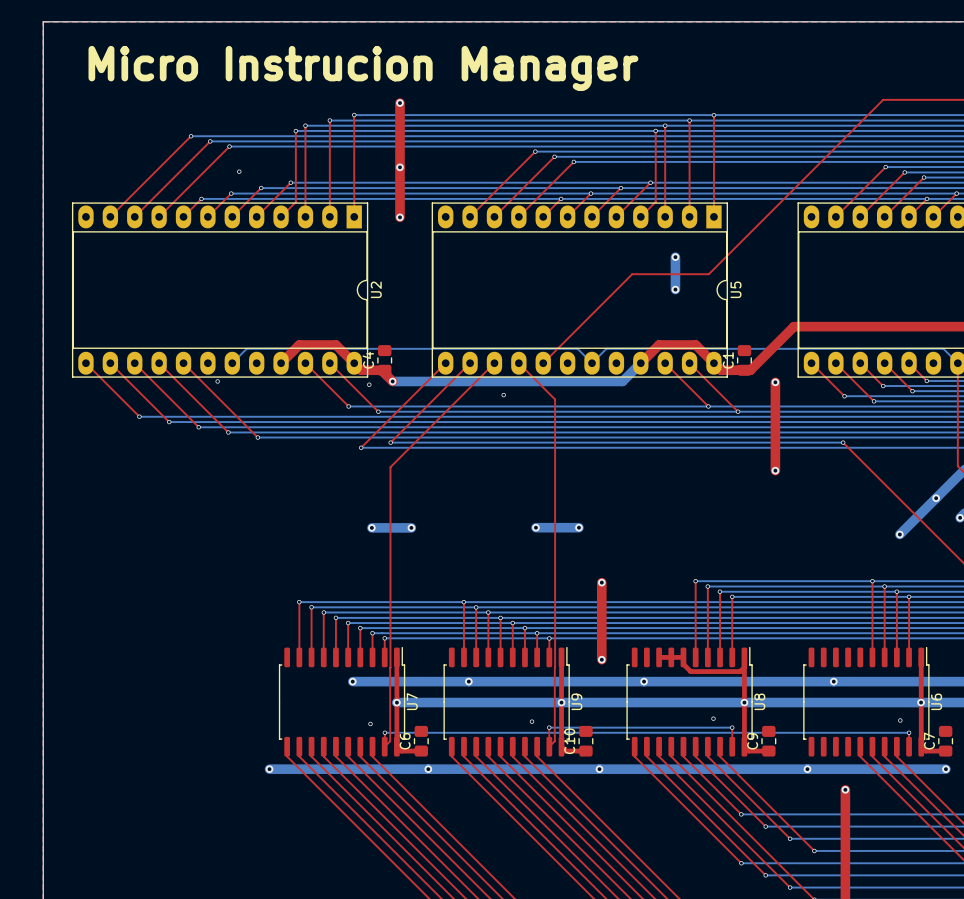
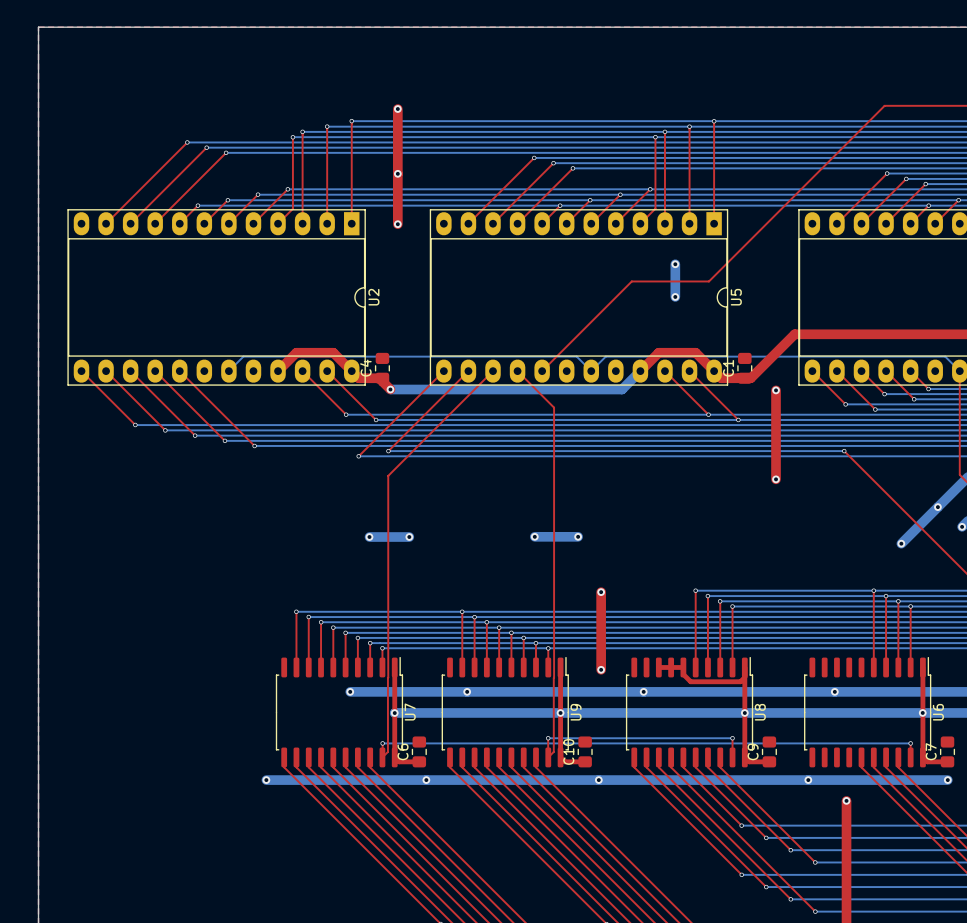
text: Micro Instrucion Manager (363, 68) -> none
via: (239, 171) -> none
via: (217, 381) -> none
via: (369, 384) -> none
via: (503, 395) -> none
via: (713, 718) -> none
via: (900, 720) -> none
via: (532, 721) -> none
via: (370, 723) -> none

